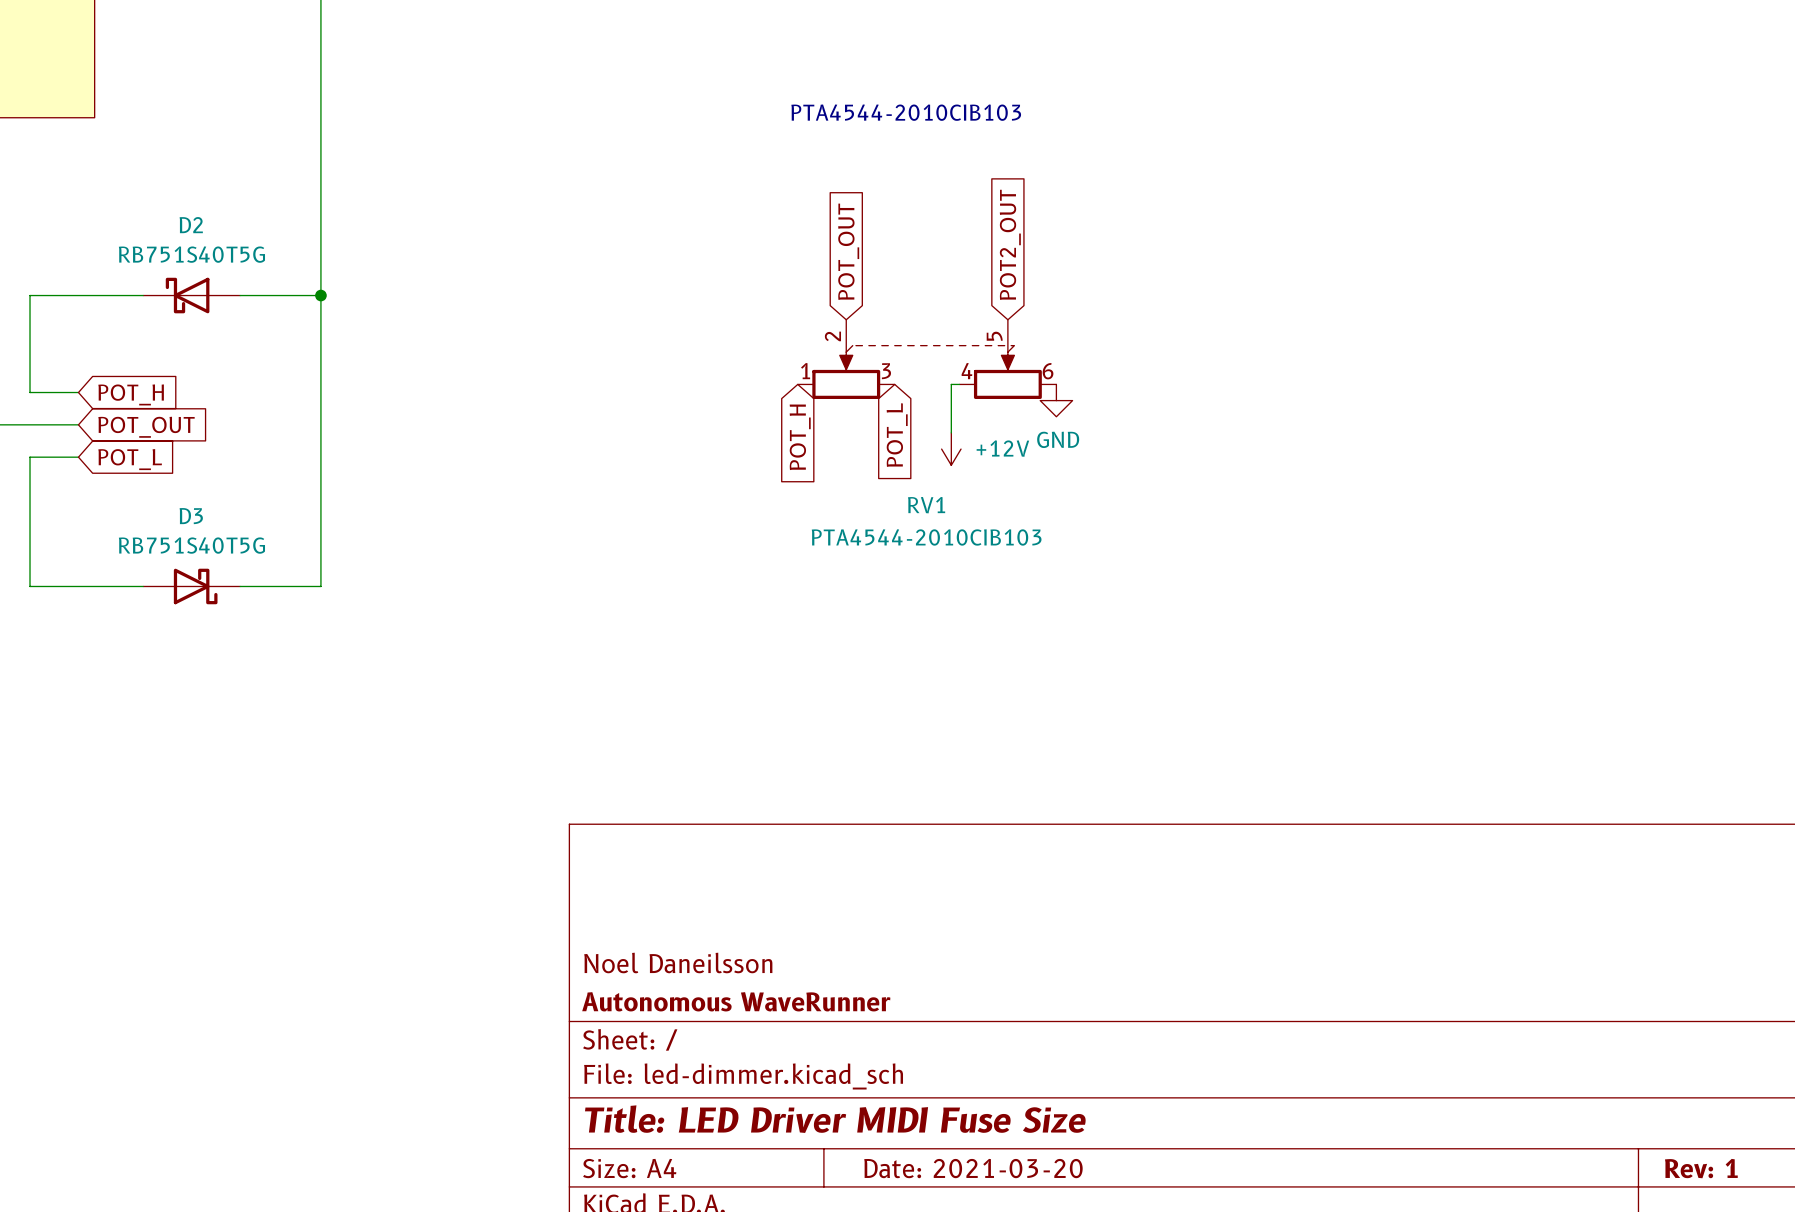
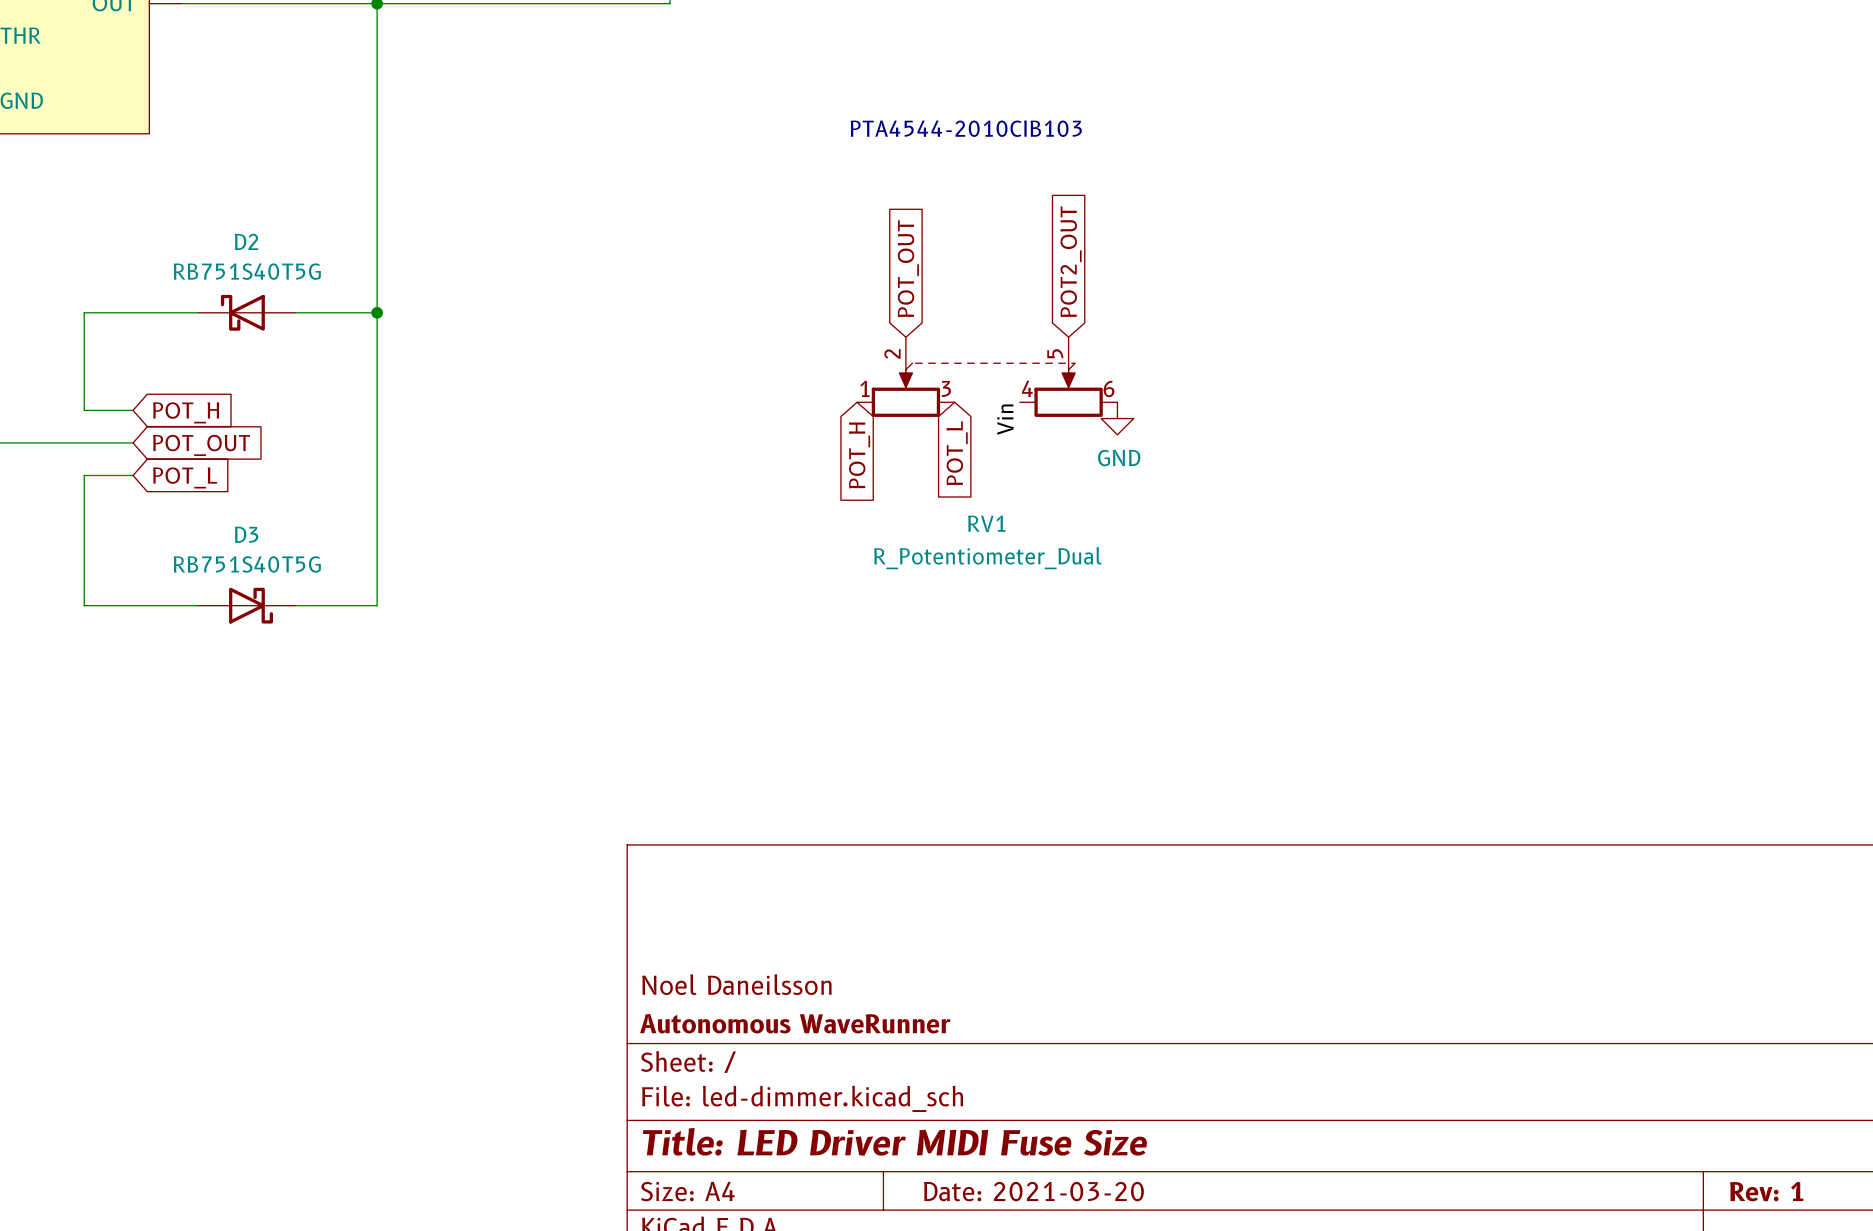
wire: (959, 384) (951, 384) (951, 432) -> none
label: none -> Vin (1005, 419)
power symbol: +12V (951, 449) -> none
RV1 value: PTA4544-2010CIB103 (926, 537) -> R_Potentiometer_Dual (987, 558)

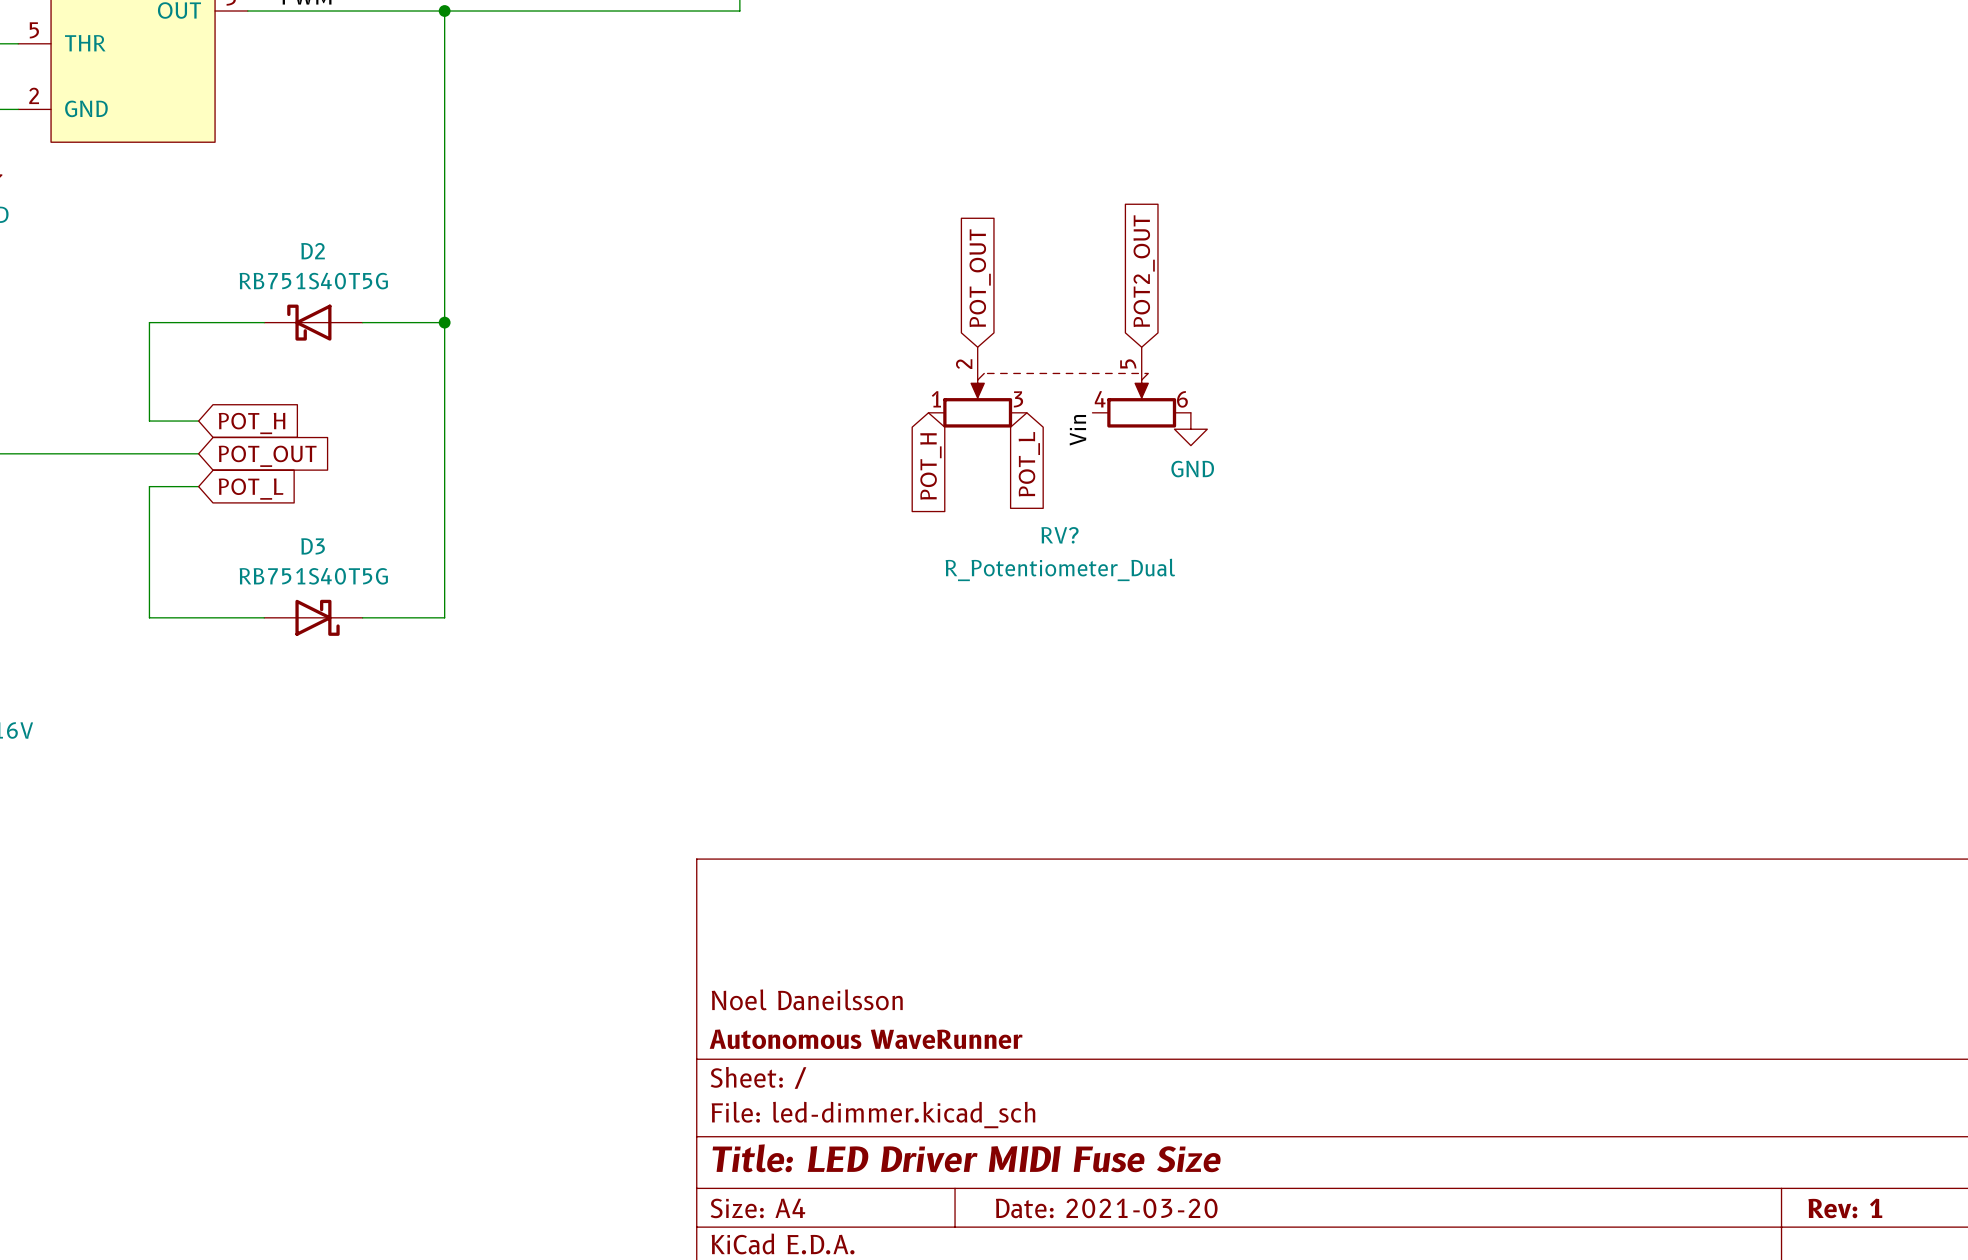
text: PTA4544-2010CIB103 (966, 128) -> none
RV1 name: RV1 (986, 523) -> RV? (1059, 535)

